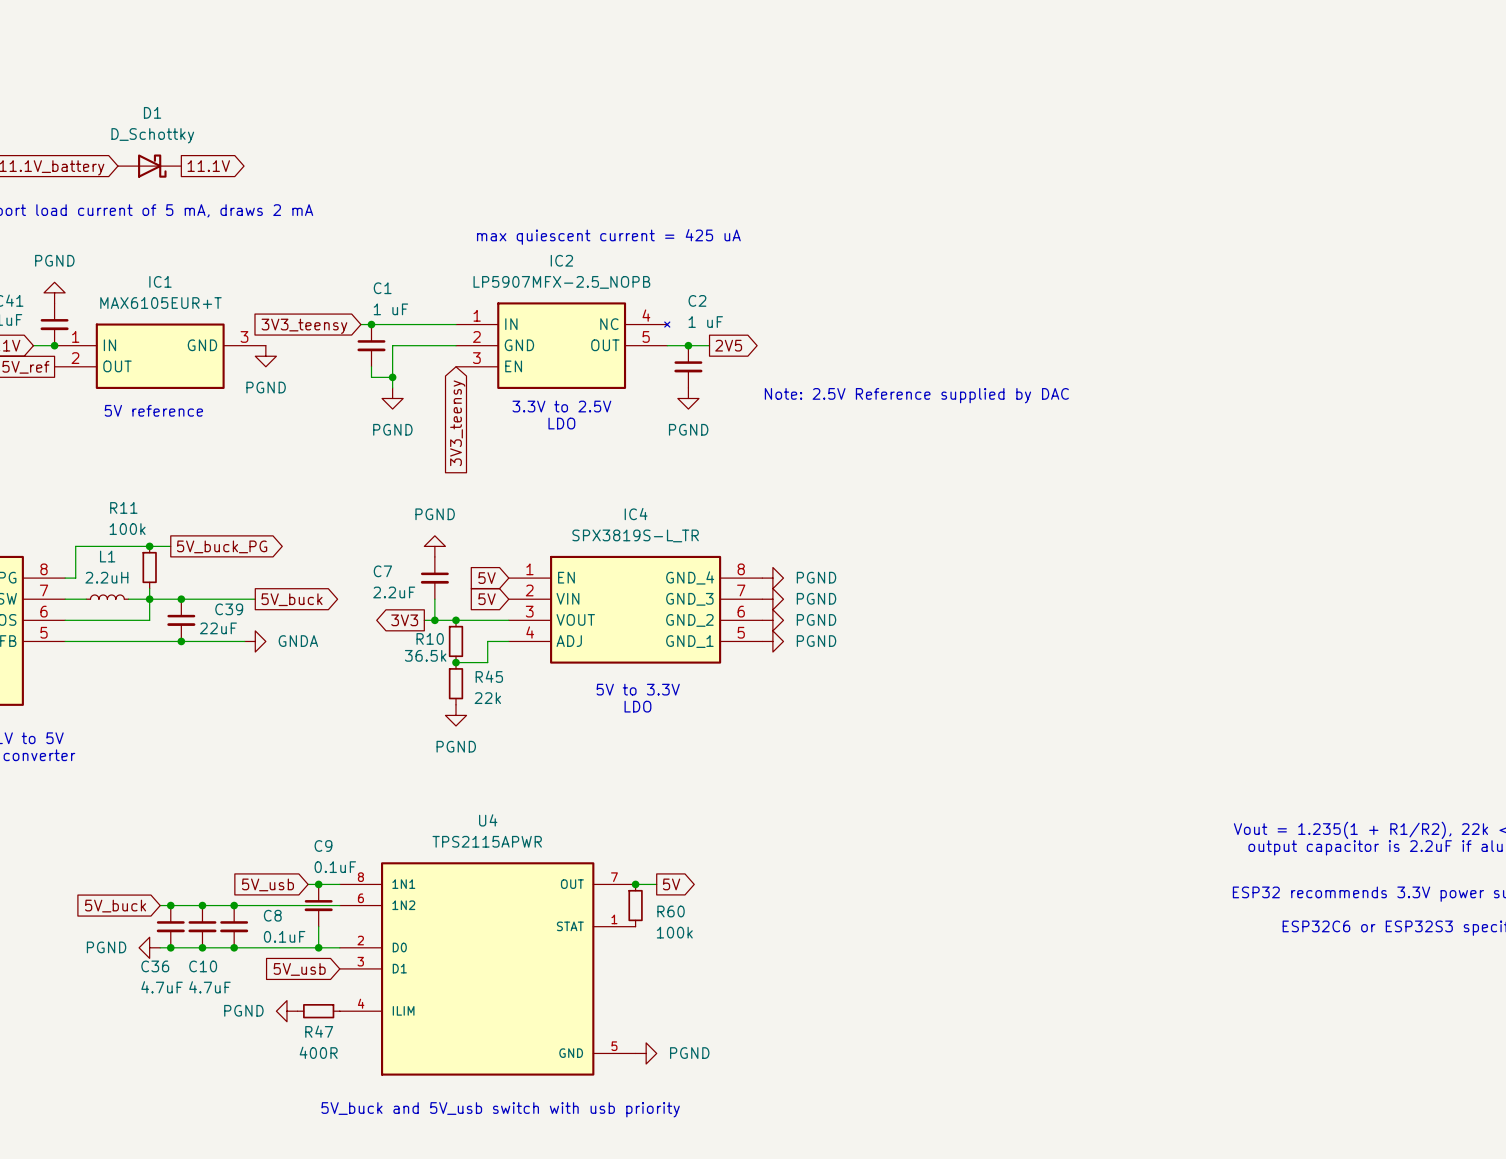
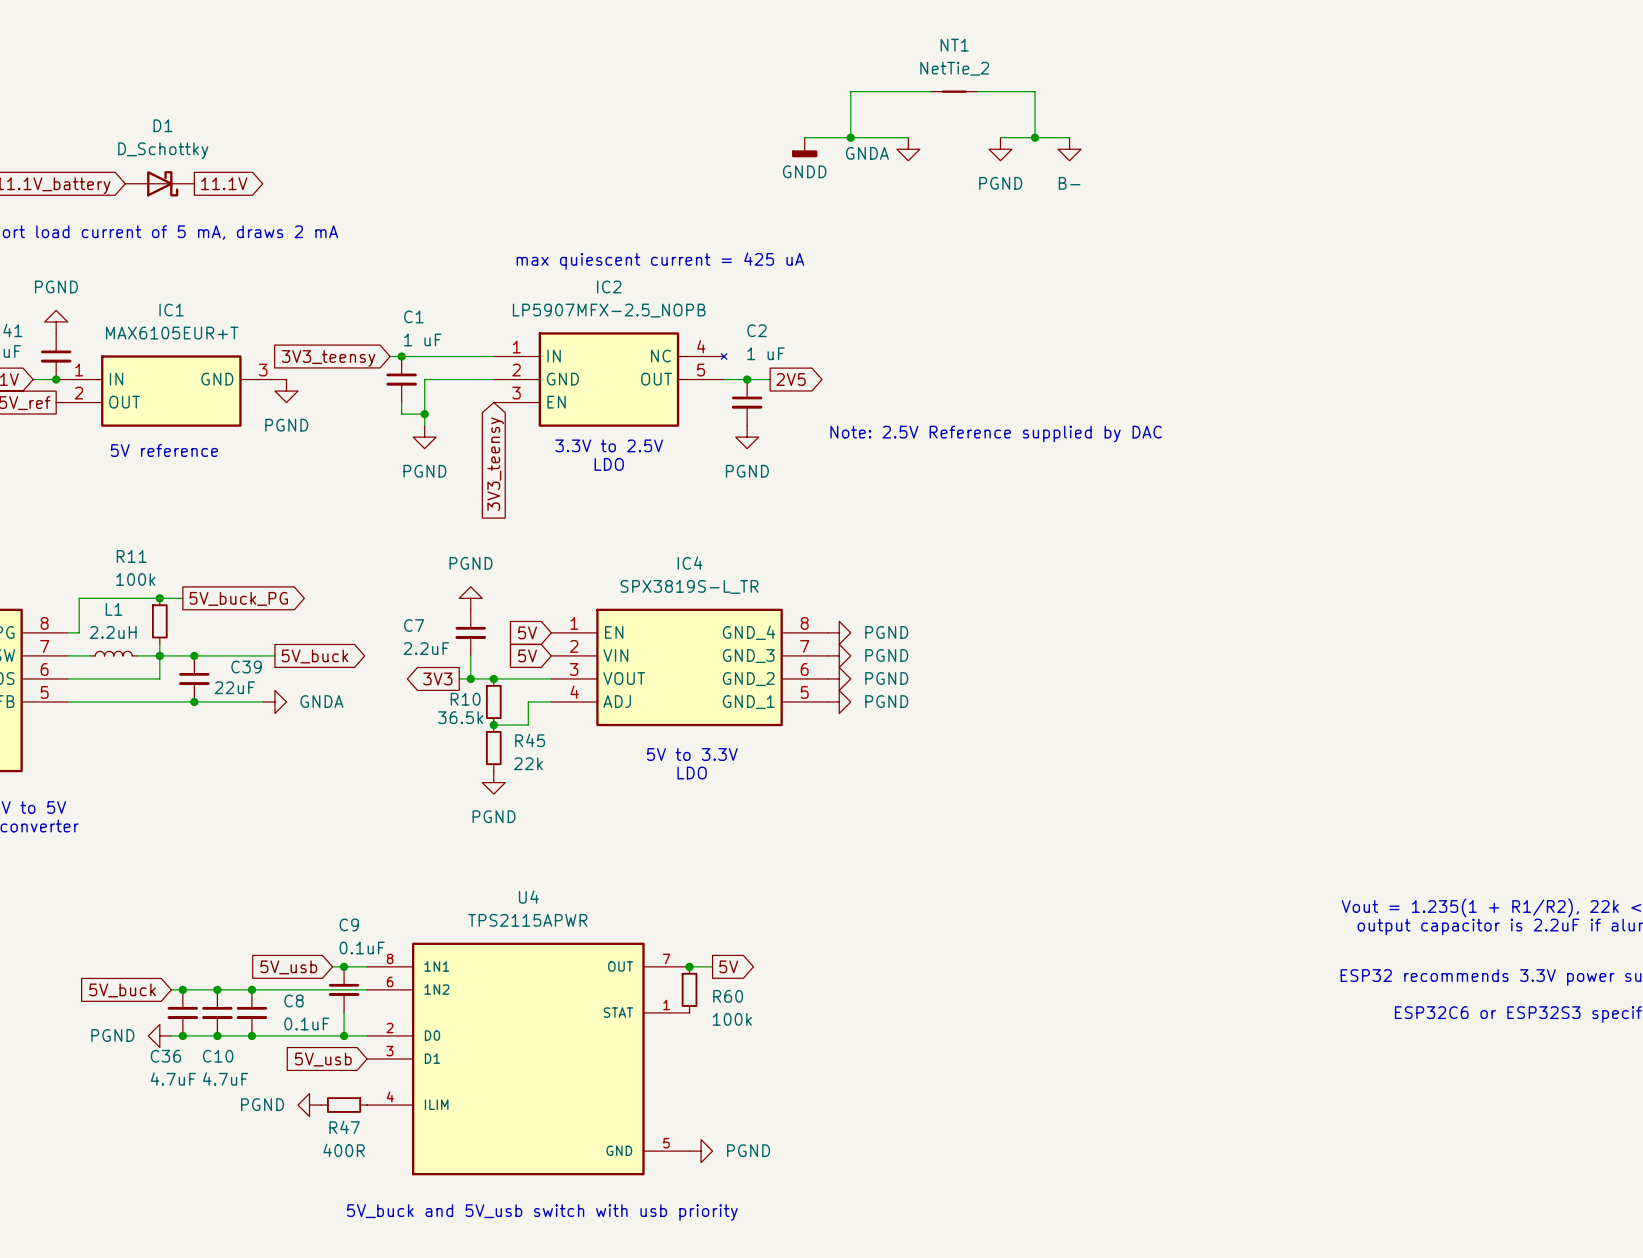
wire: none -> (931, 91) (850, 91) (850, 137)
NT1: none -> NetTie_2 (954, 91)
wire: none -> (977, 91) (1035, 91) (1035, 137)
wire: none -> (804, 137) (908, 137)
junction: none -> (850, 137)
wire: none -> (1000, 137) (1069, 137)
junction: none -> (1035, 137)
power symbol: none -> GNDD (804, 147)
power symbol: none -> GNDA (908, 149)
power symbol: none -> PGND (1000, 149)
power symbol: none -> B- (1069, 149)

